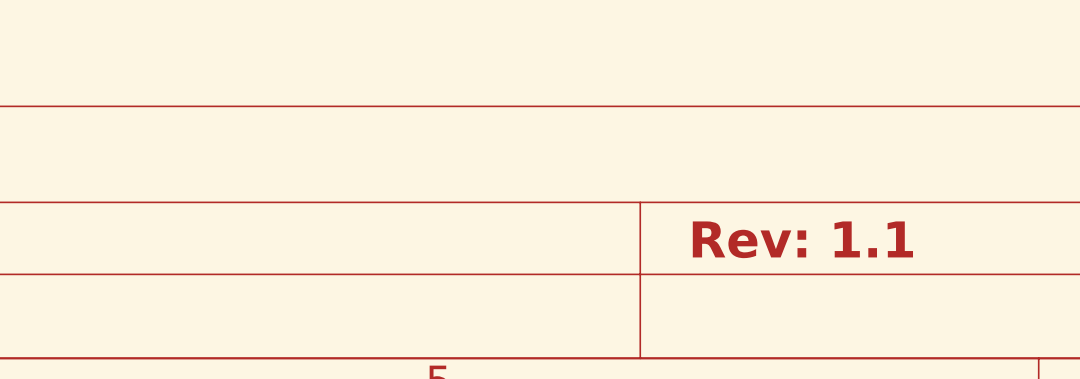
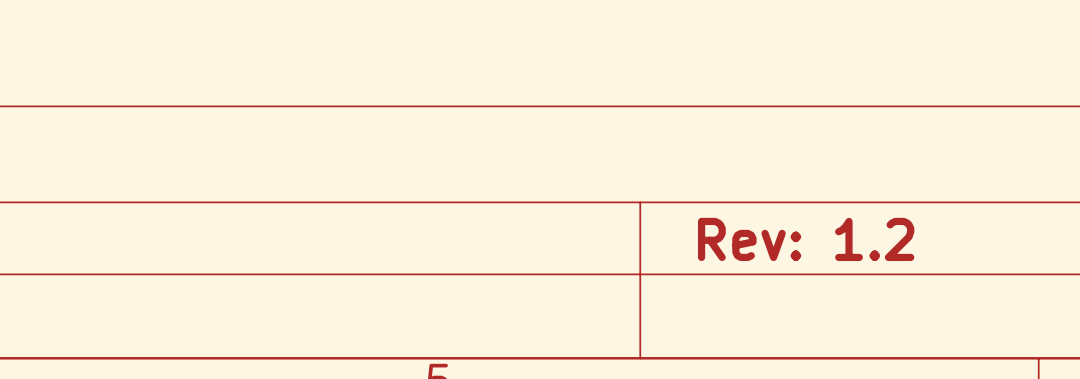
title block: Rev: 1.1 (802, 239) -> Rev: 1.2 (806, 239)

